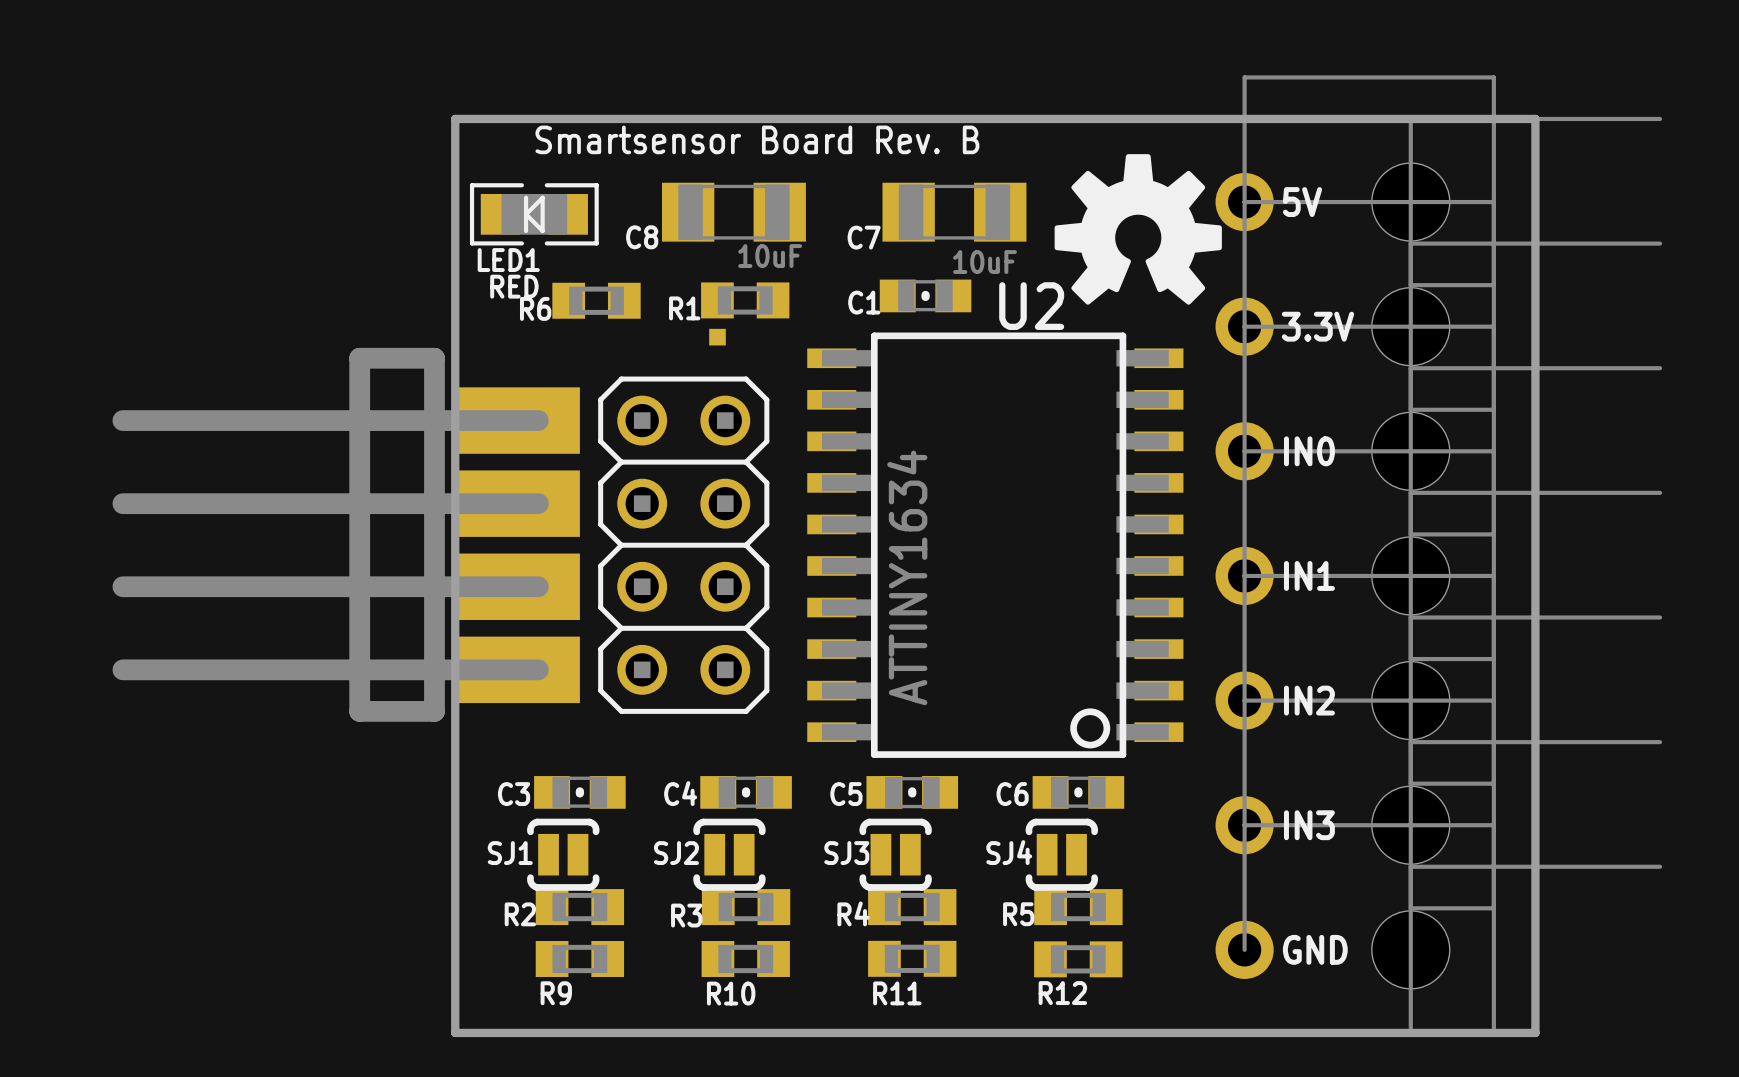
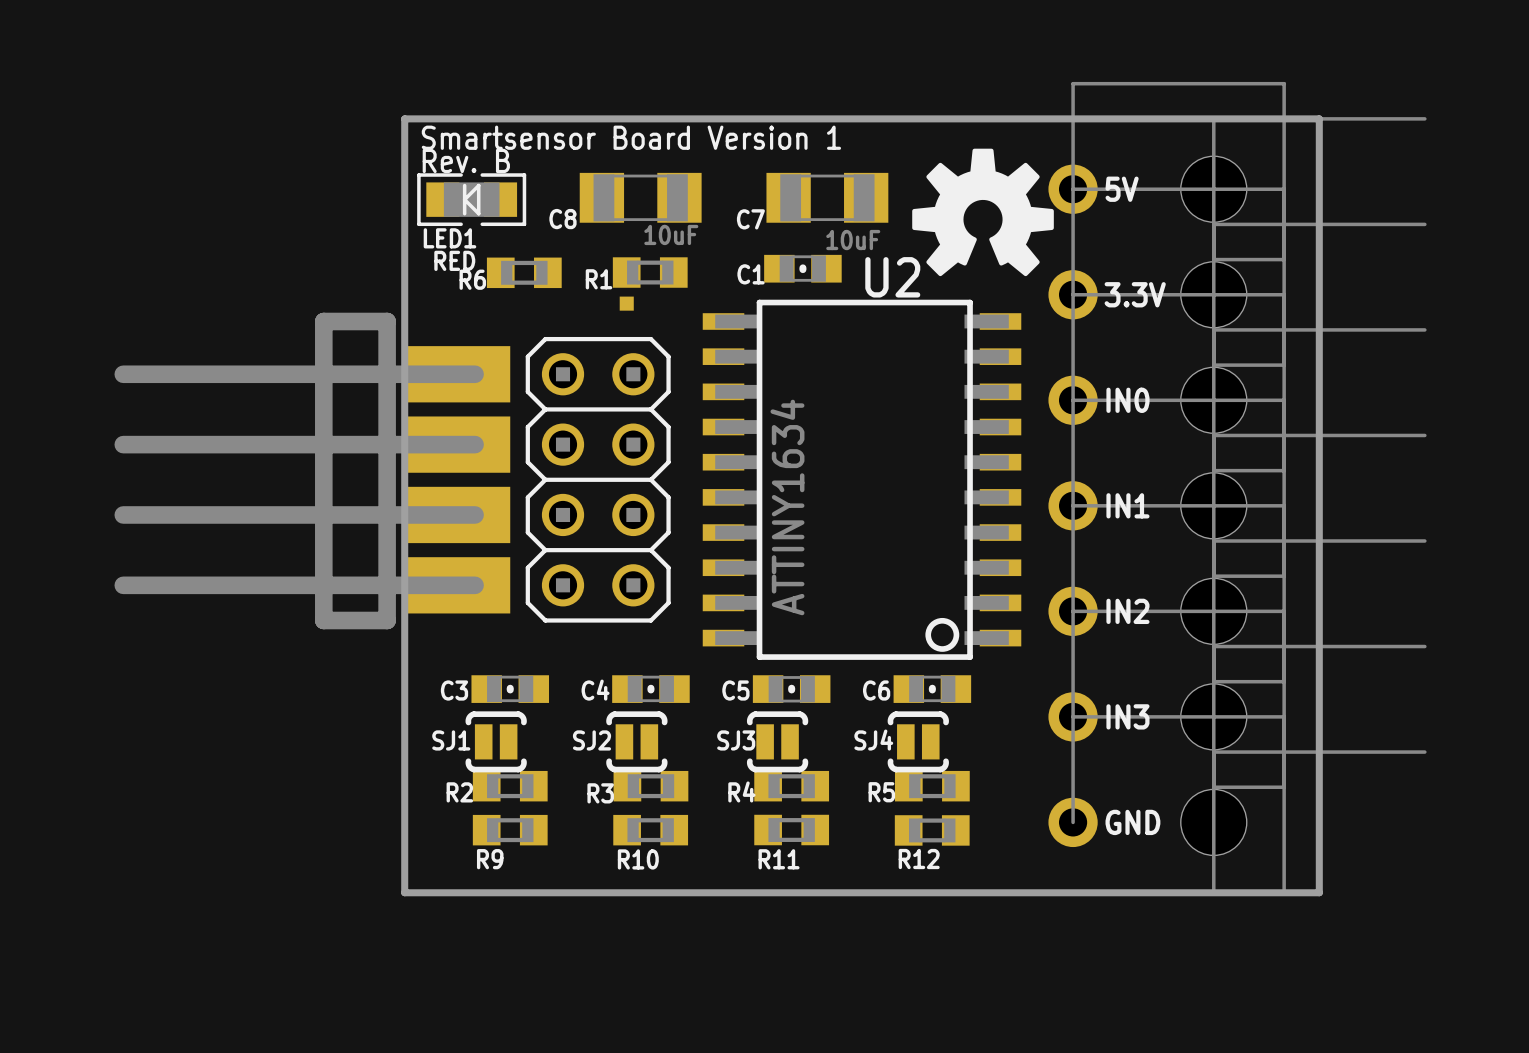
text: Smartsensor Board Rev. B (757, 139) -> Smartsensor Board Version 1 (631, 137)
text: none -> Rev. B (466, 160)

